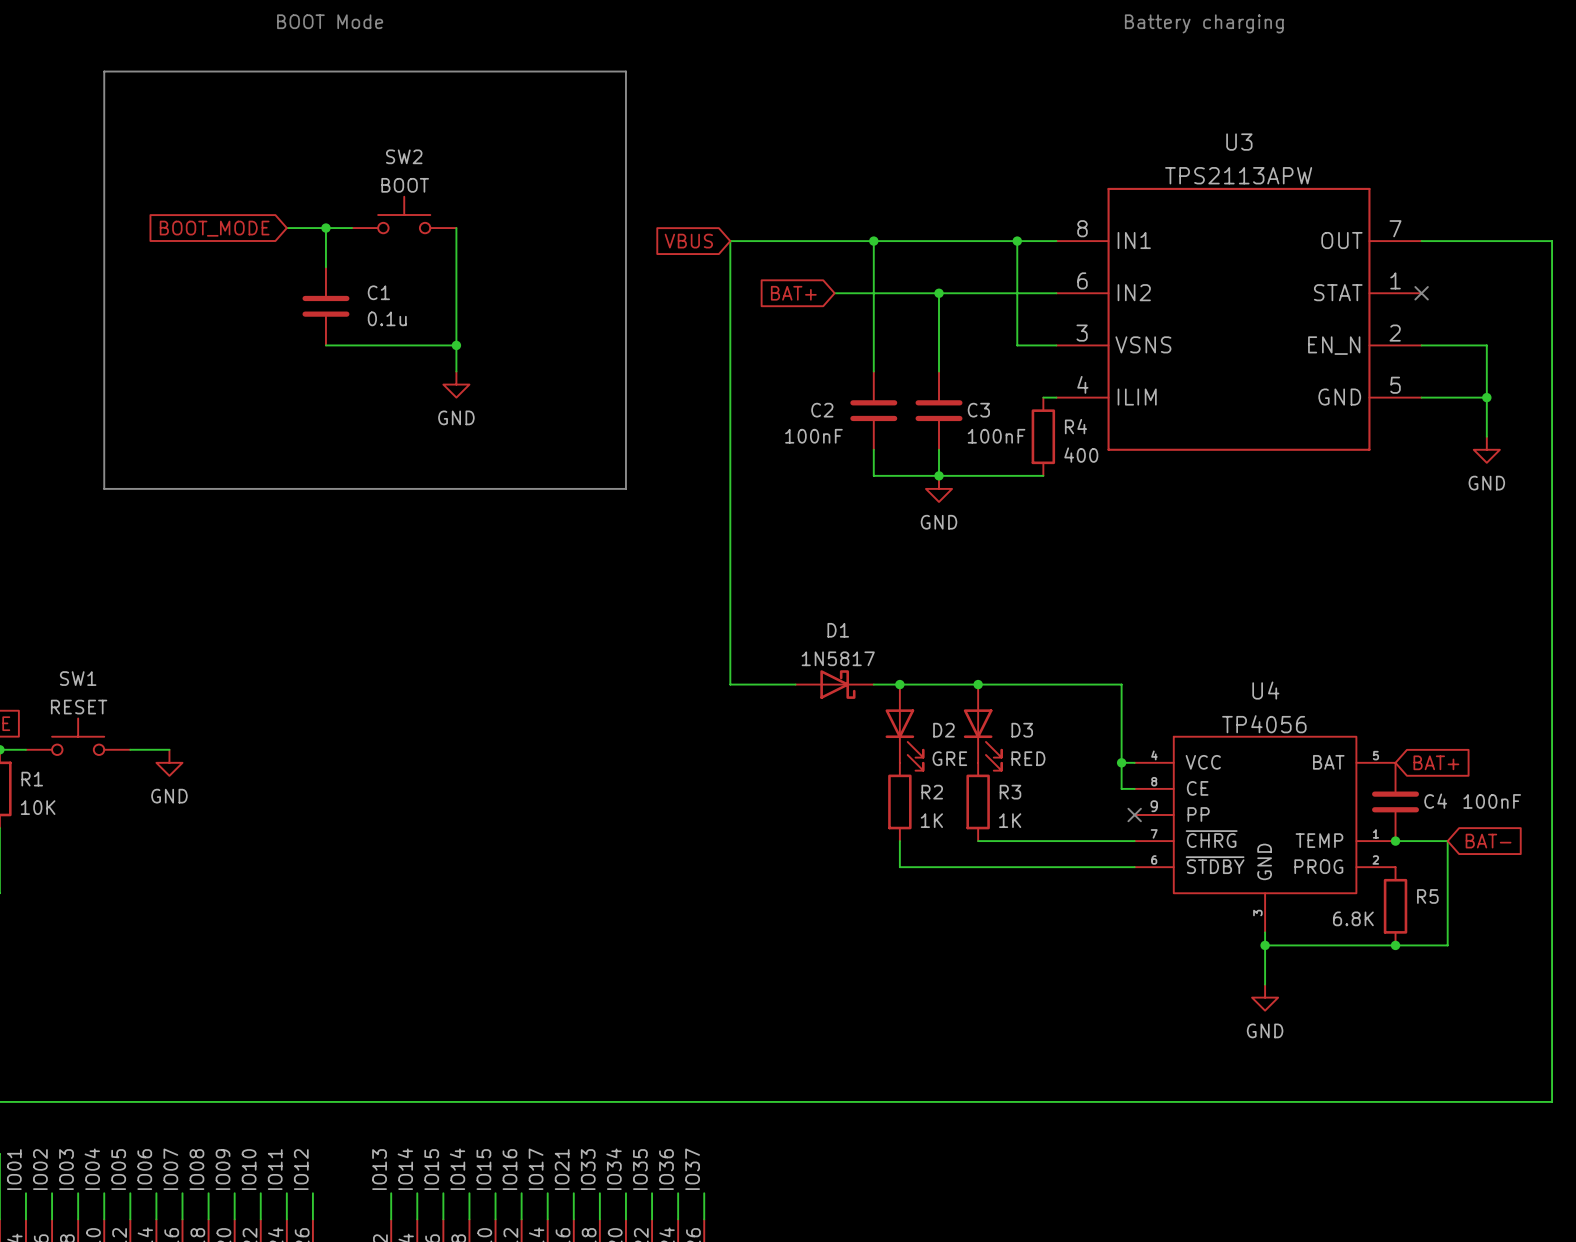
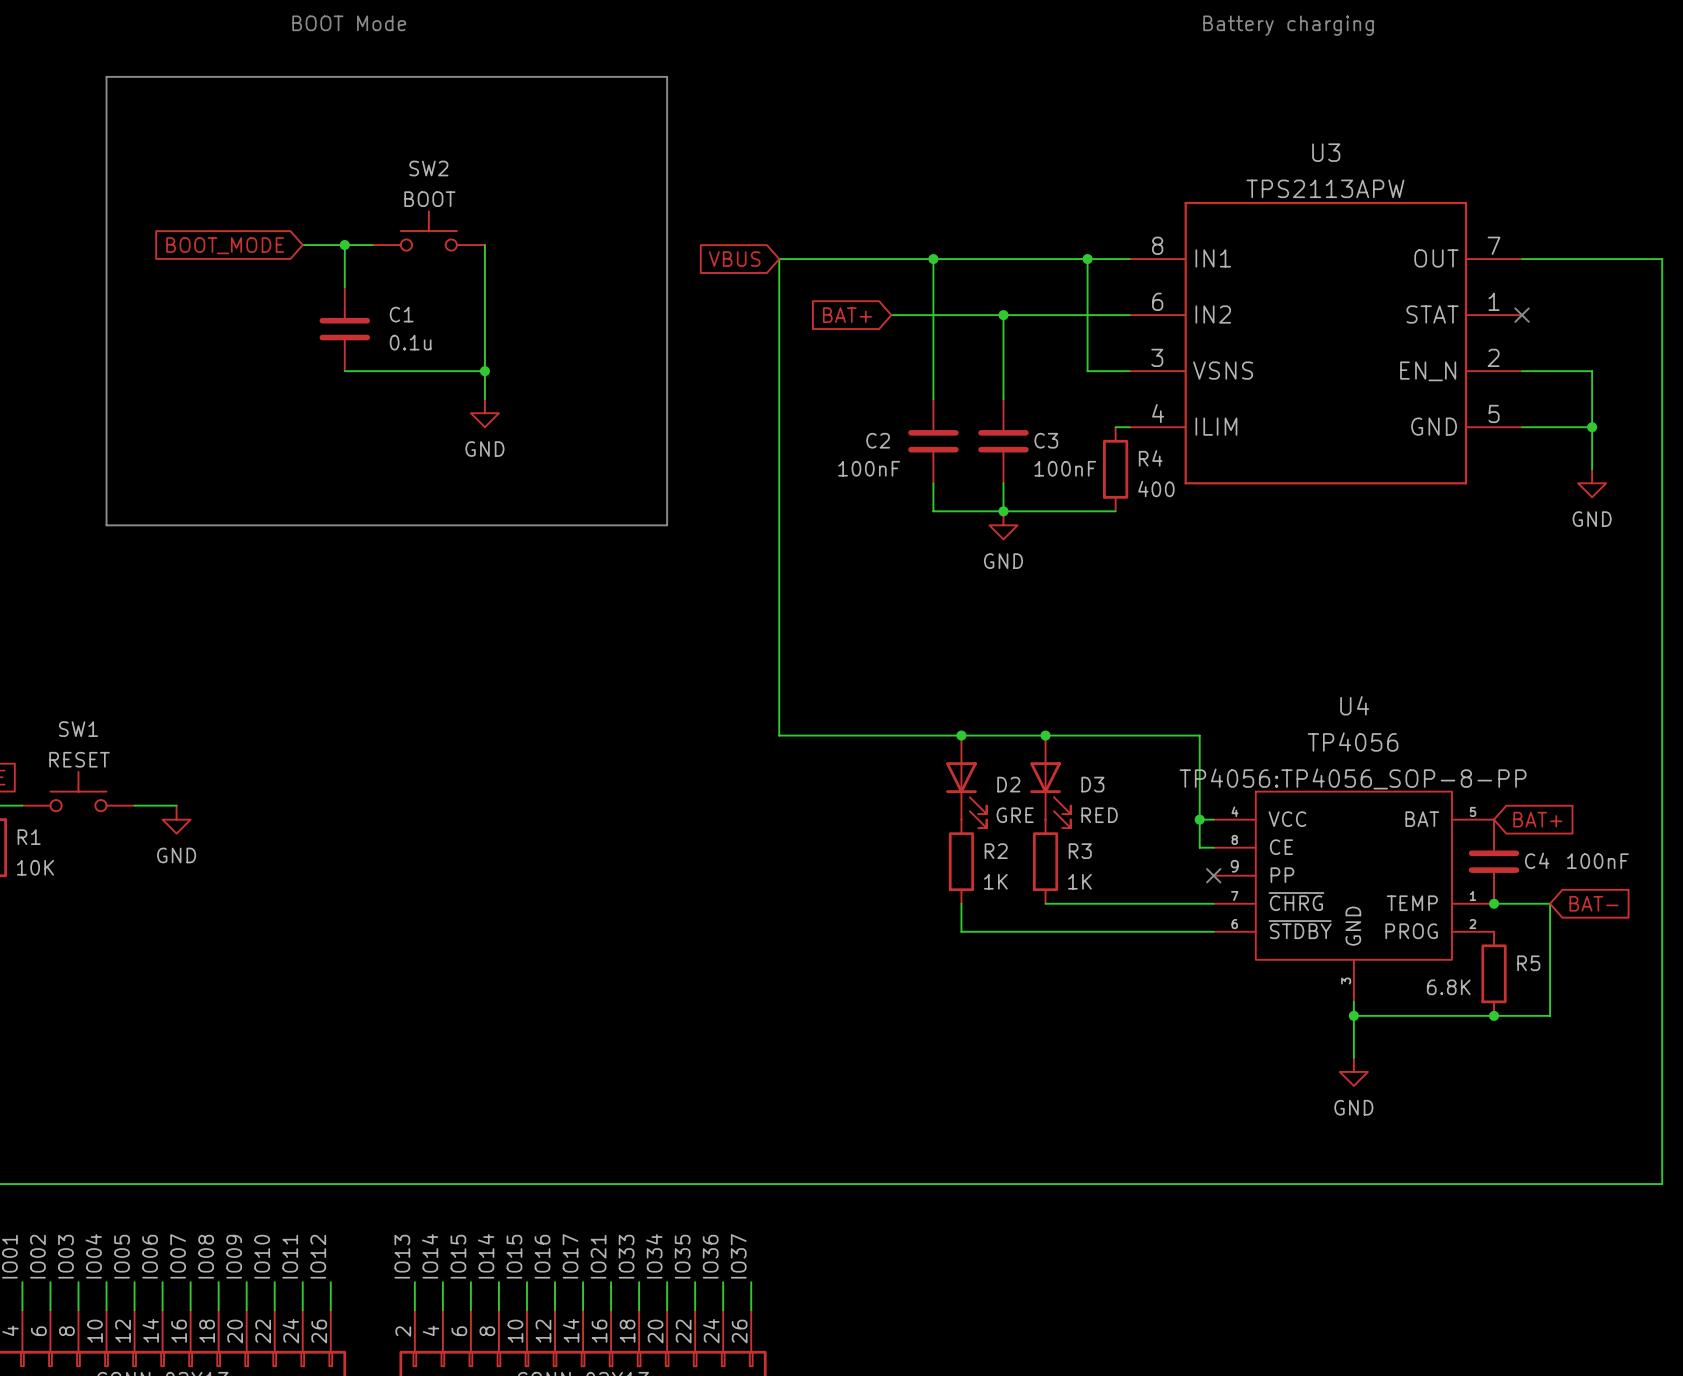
D1: 1N5817 (834, 684) -> none
U4 name position: U4 (1265, 690) -> U4 (1354, 705)
U4 text: none -> TP4056:TP4056_SOP-8-PP (1353, 778)
U4 value position: TP4056 (1264, 724) -> TP4056 (1353, 742)

